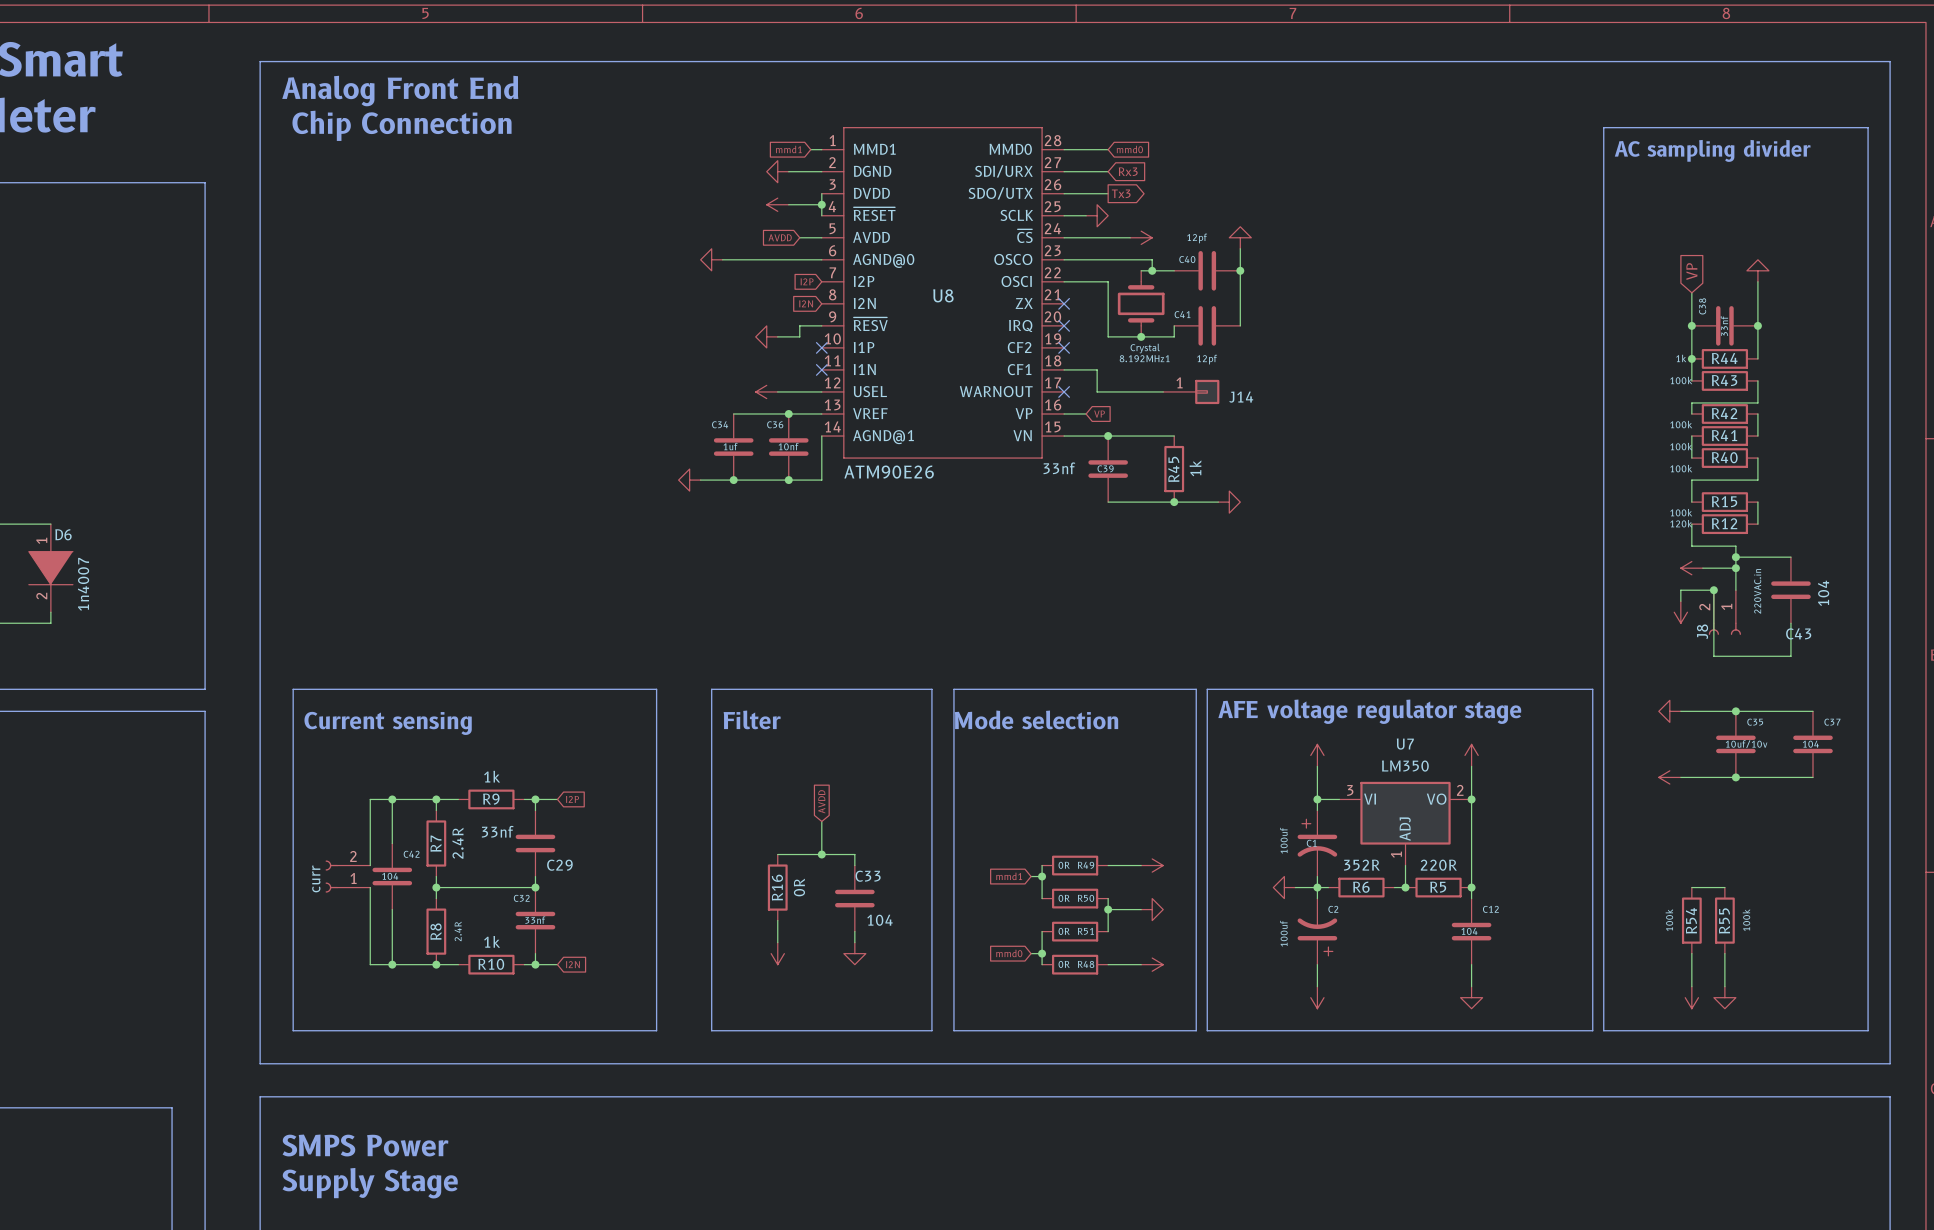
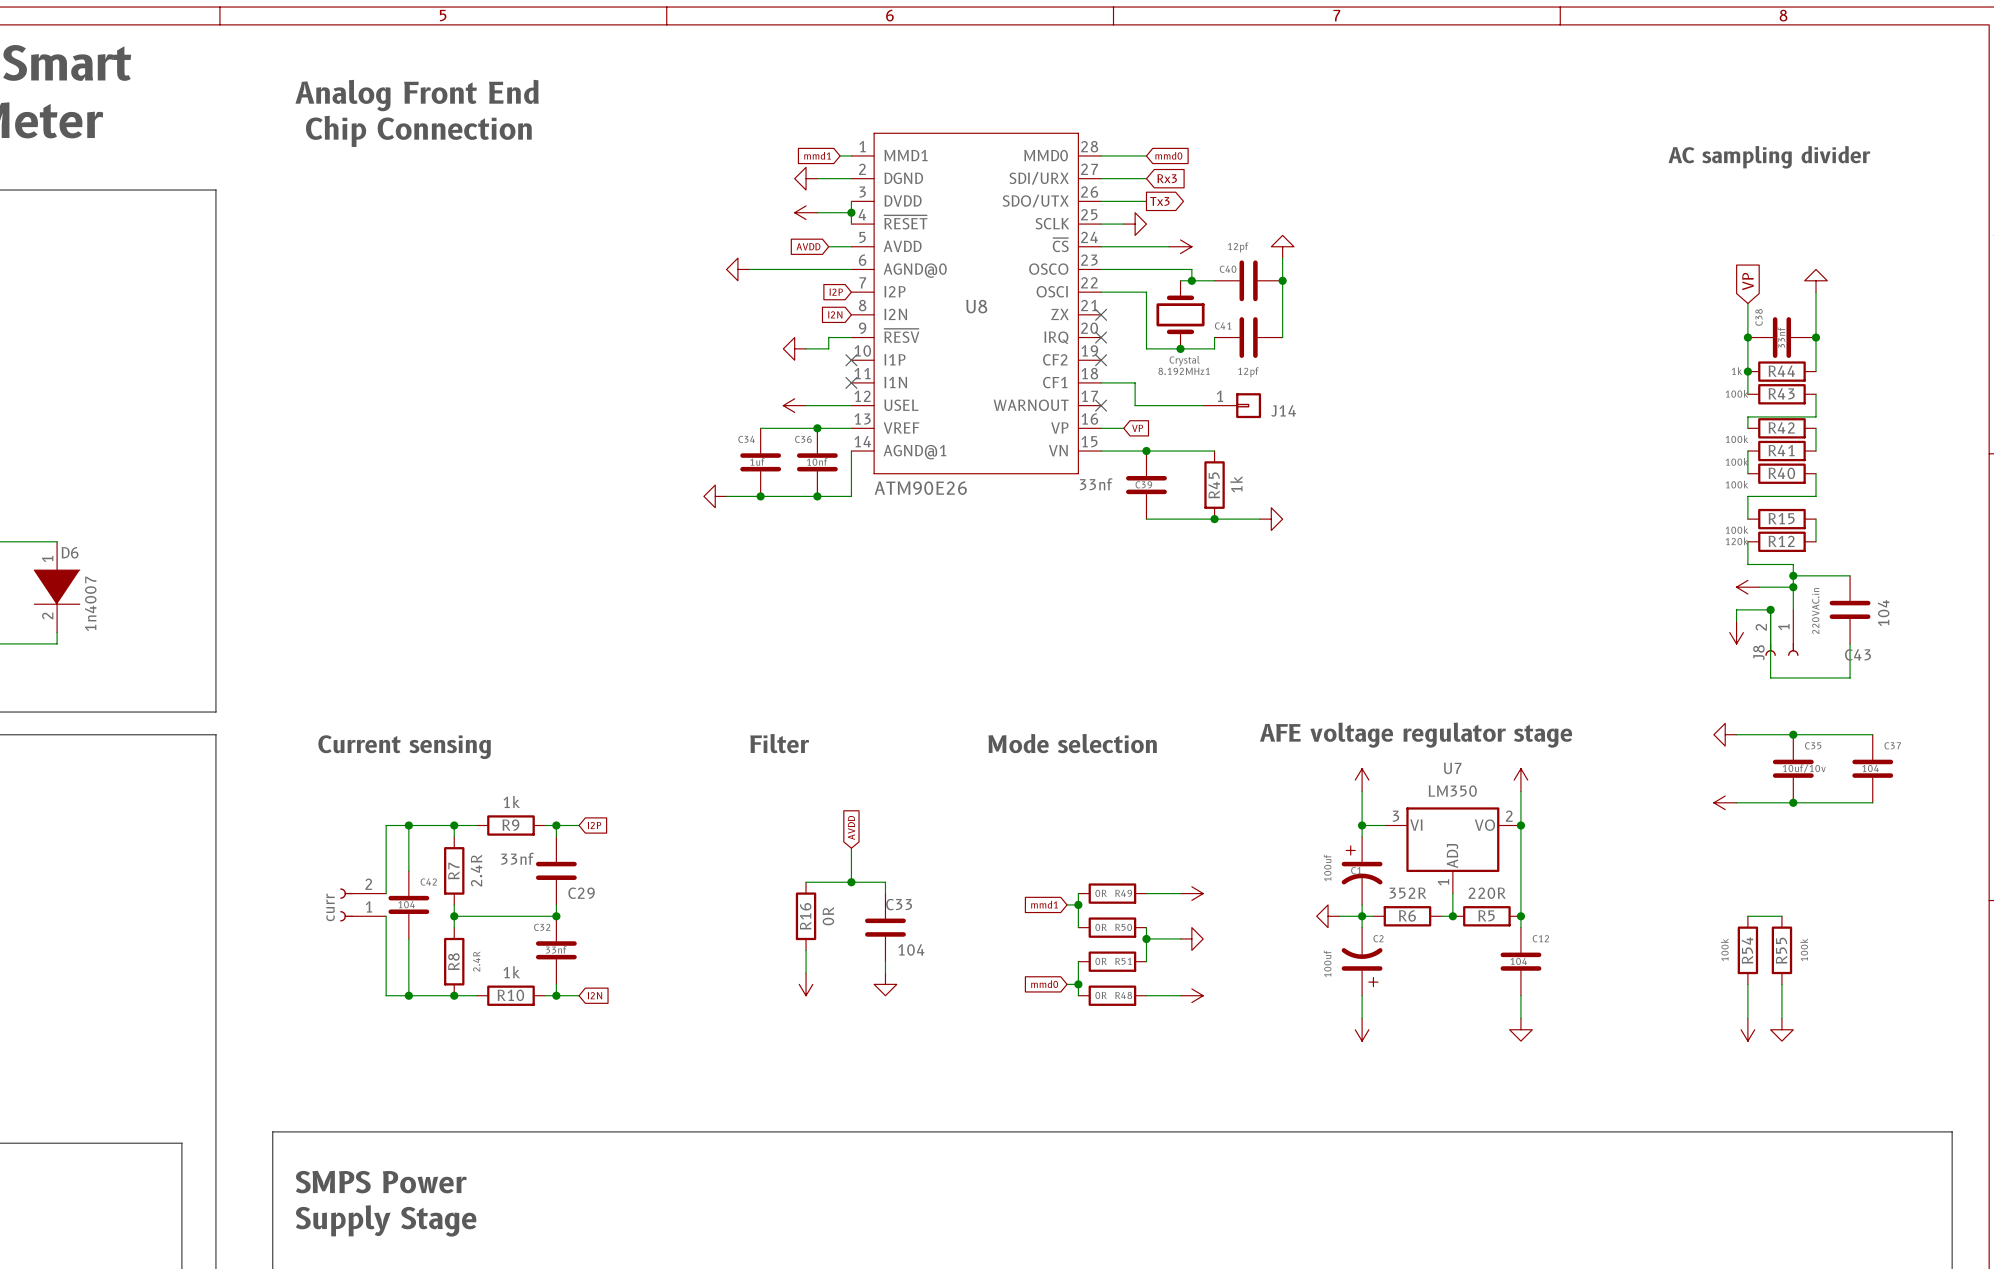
line: (260, 61) (1890, 61) (1890, 1063) (260, 1063) (260, 61) -> none
line: (1603, 127) (1868, 127) (1868, 1030) (1603, 1030) (1603, 127) -> none
line: (293, 689) (656, 689) (656, 1030) (293, 1030) (293, 689) -> none
line: (711, 689) (931, 689) (931, 1030) (711, 1030) (711, 689) -> none
line: (953, 689) (1196, 689) (1196, 1030) (953, 1030) (953, 689) -> none
line: (1207, 689) (1207, 1030) (1592, 1030) (1592, 689) (1207, 689) -> none

